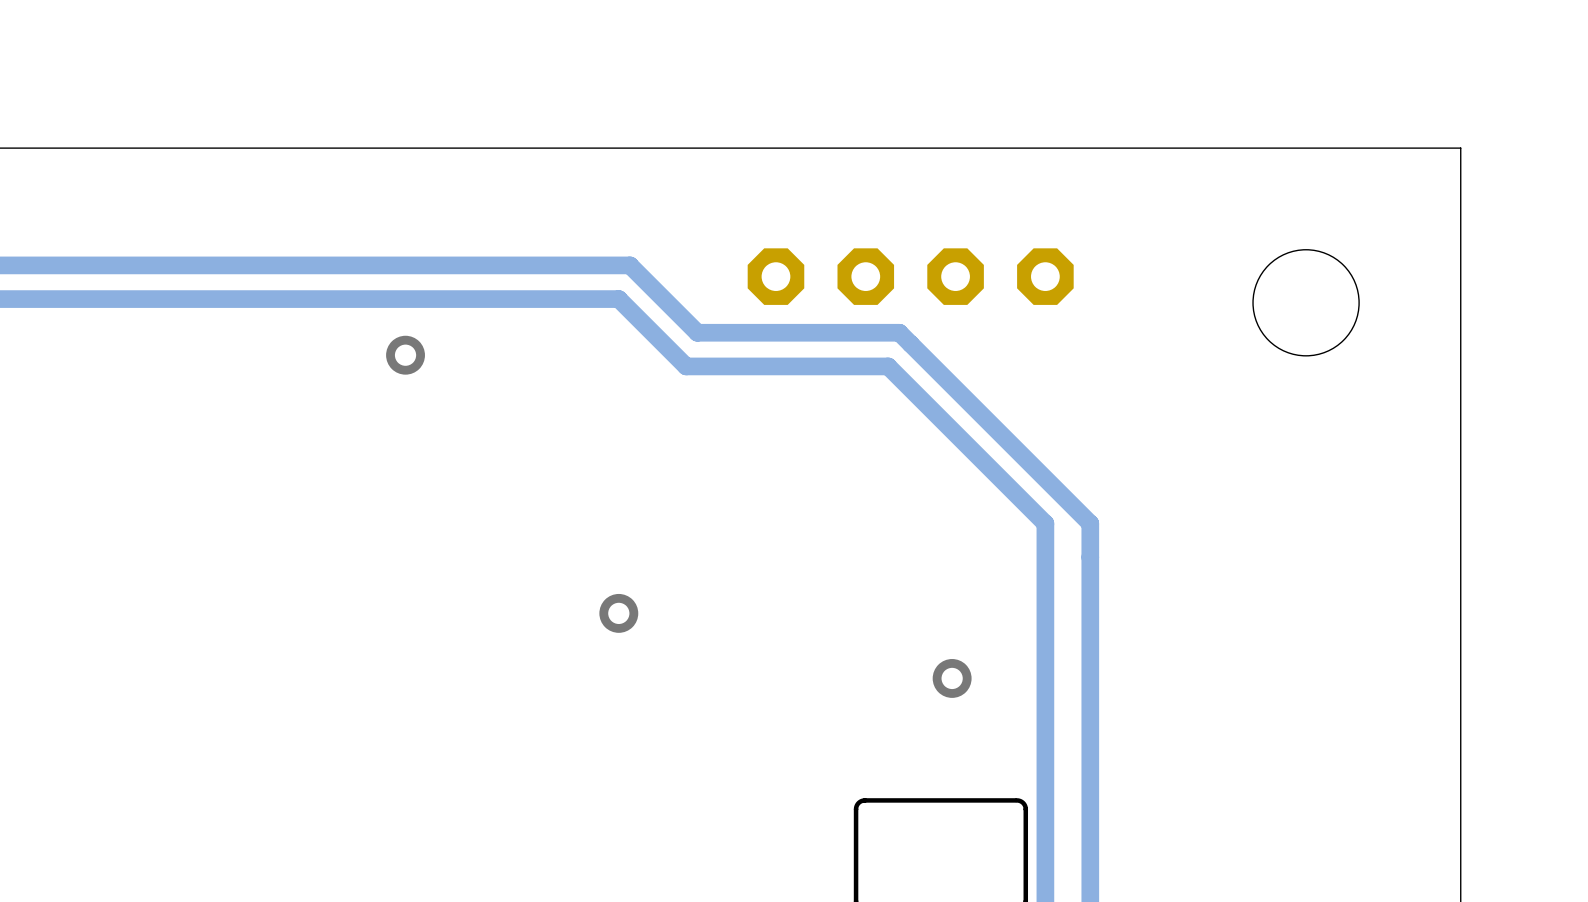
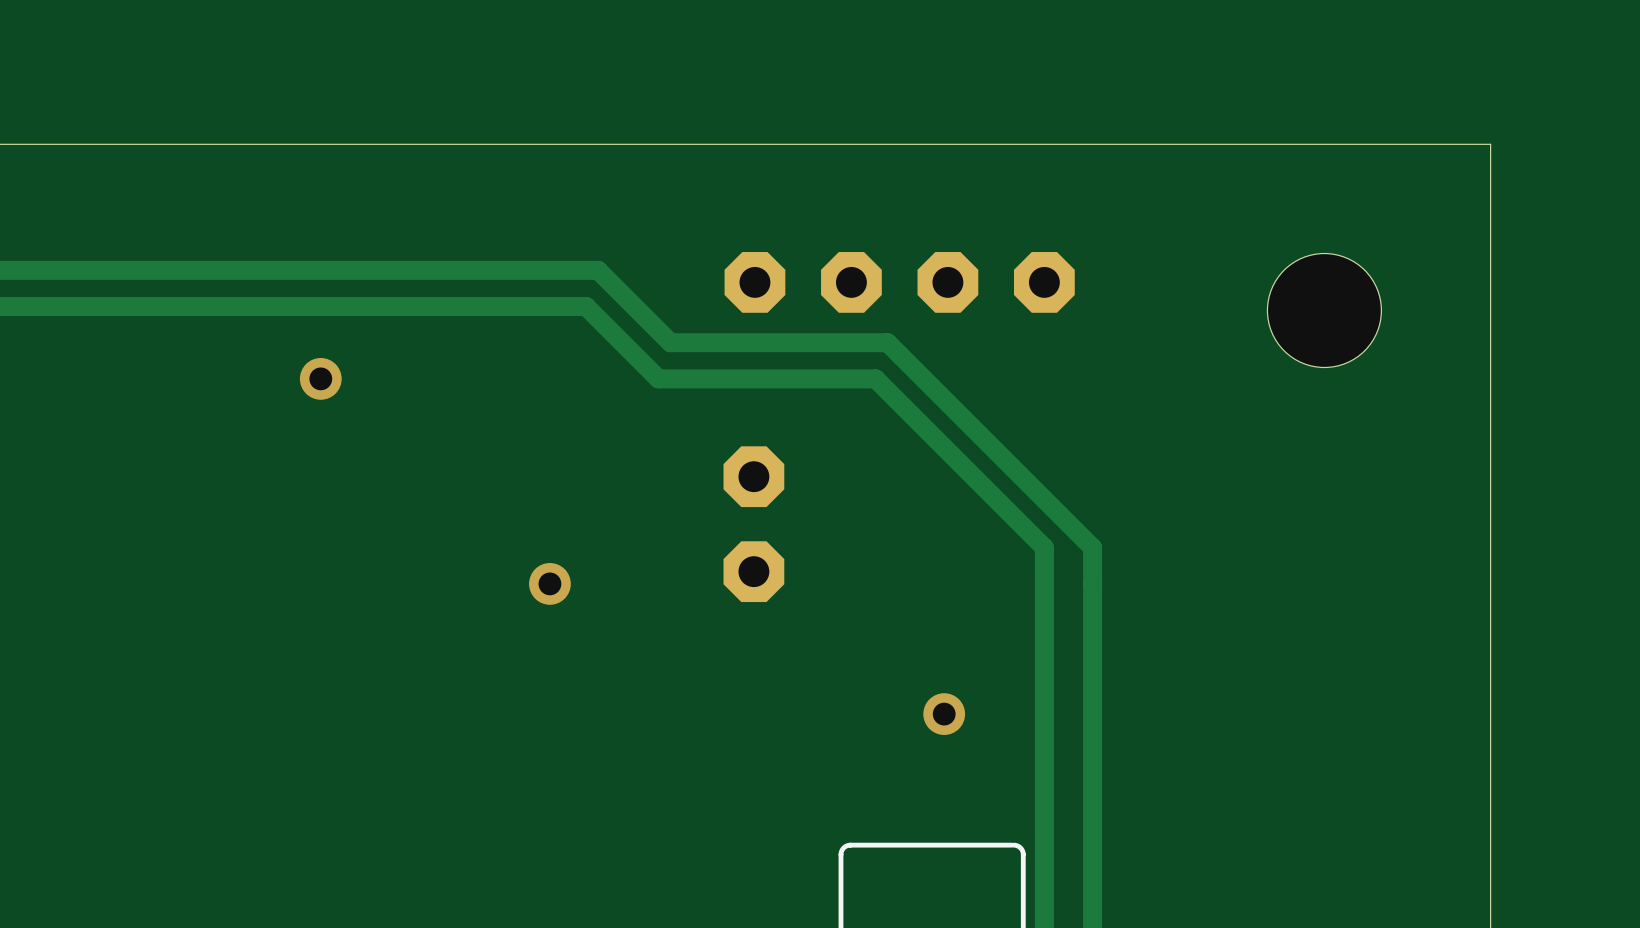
via position: (405, 355) -> (320, 378)
part: none -> (753, 476)
part: none -> (753, 571)
via position: (618, 613) -> (549, 583)

